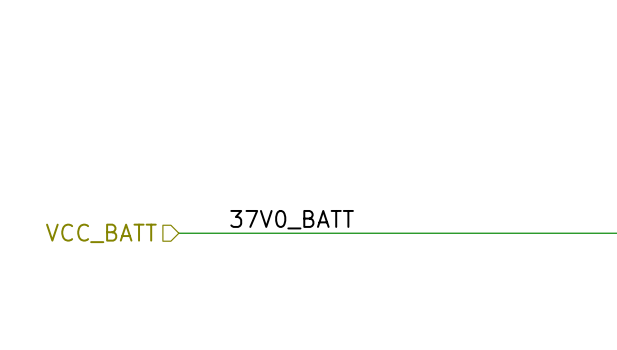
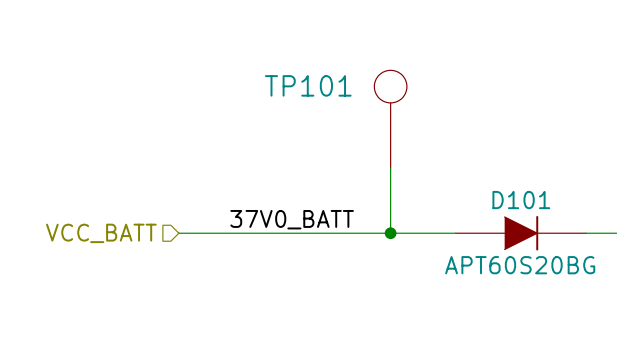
TP101: none -> (390, 119)
wire: none -> (390, 168) (390, 233)
junction: none -> (390, 233)
D101: none -> APT60S20BG (520, 233)

